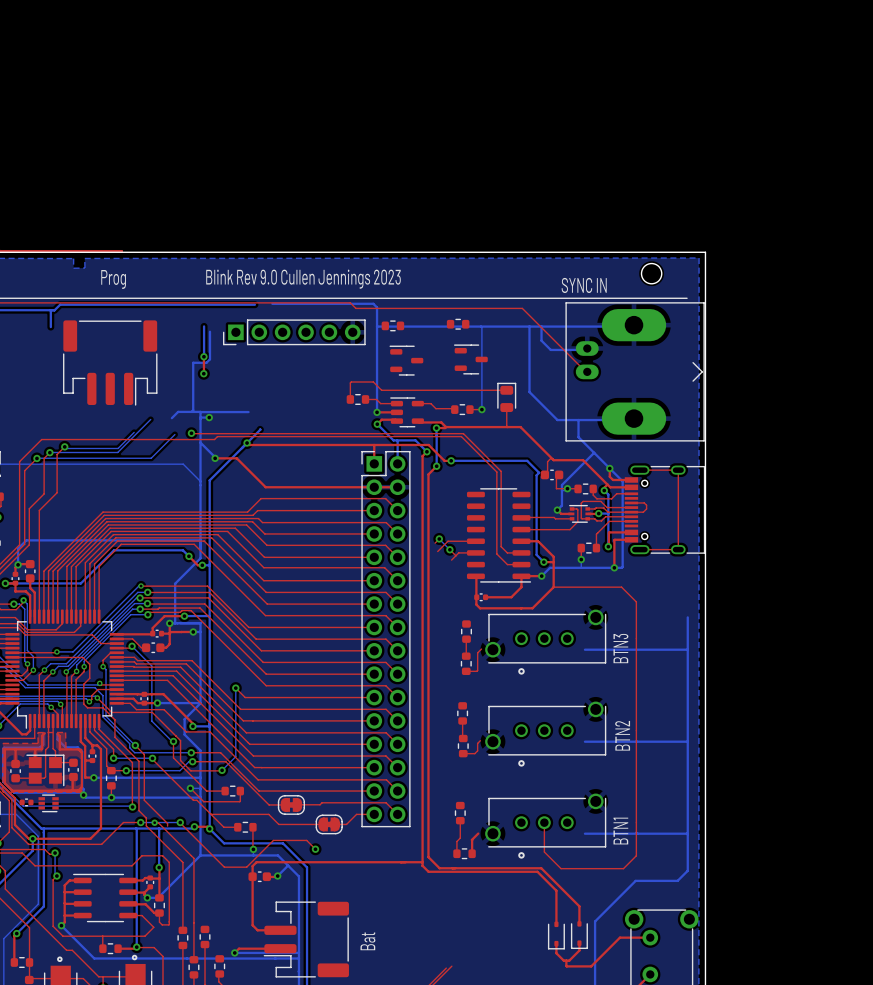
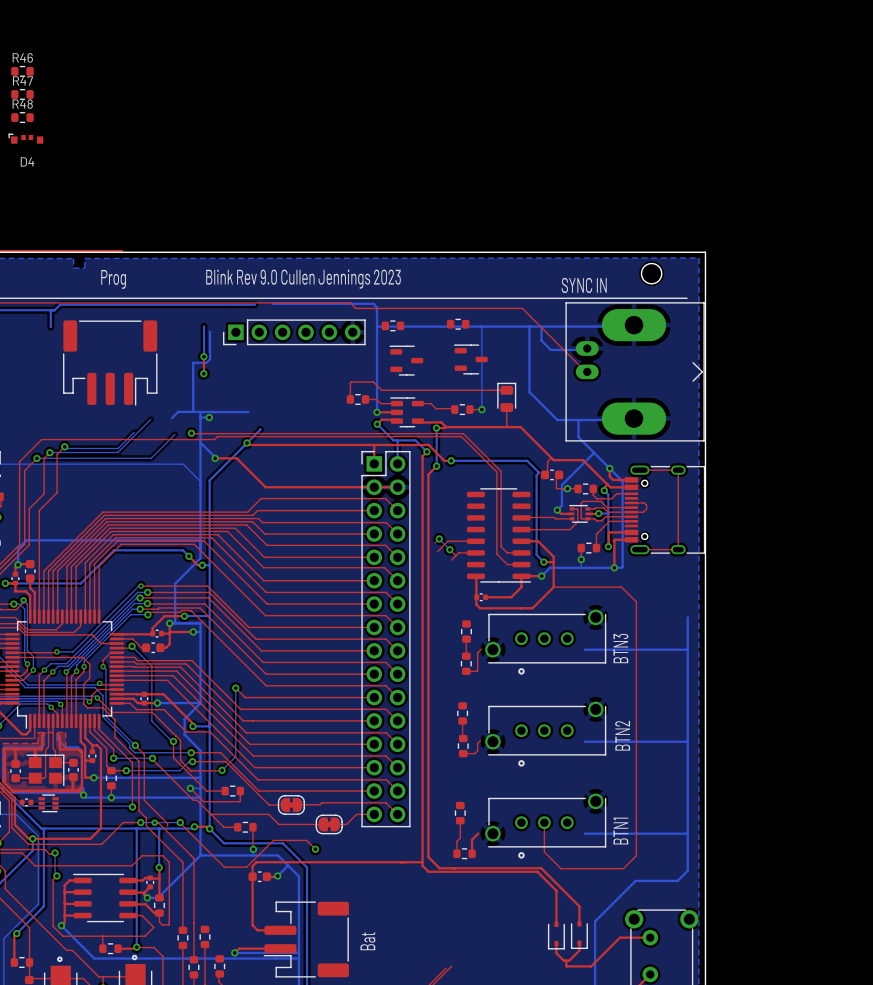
R46: none -> (22, 71)
R47: none -> (22, 94)
R48: none -> (22, 117)
D4: none -> (25, 138)

